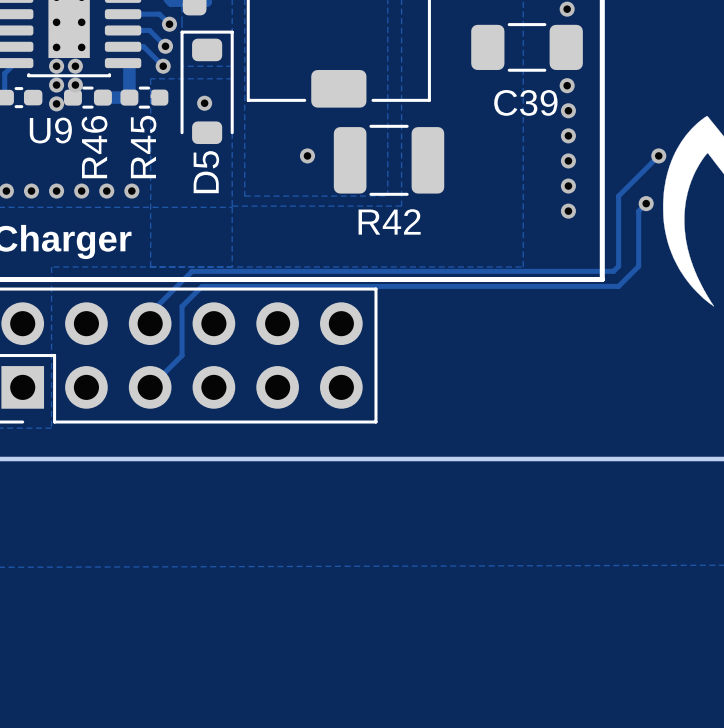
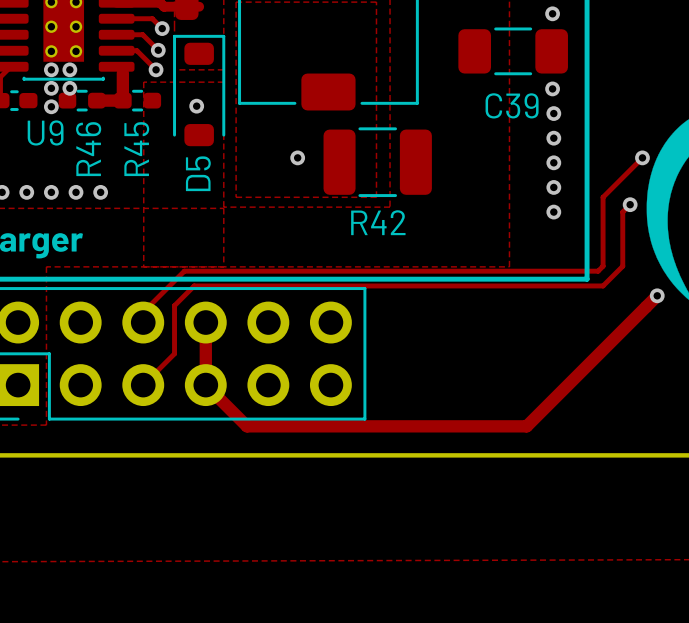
via: (131, 191) -> none
track: none -> (657, 295) (526, 426) (247, 426) (205, 385) (205, 322)
via: none -> (657, 295)

